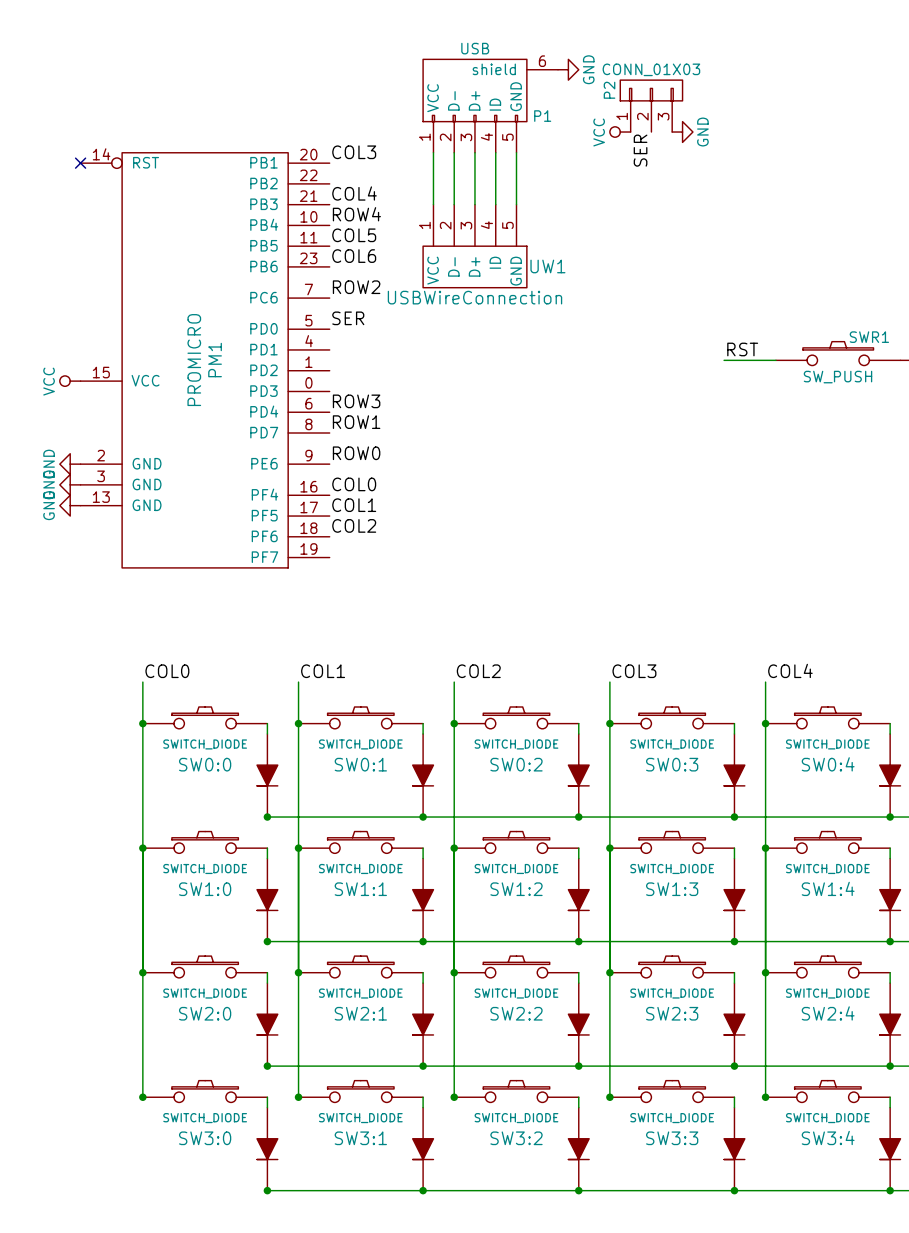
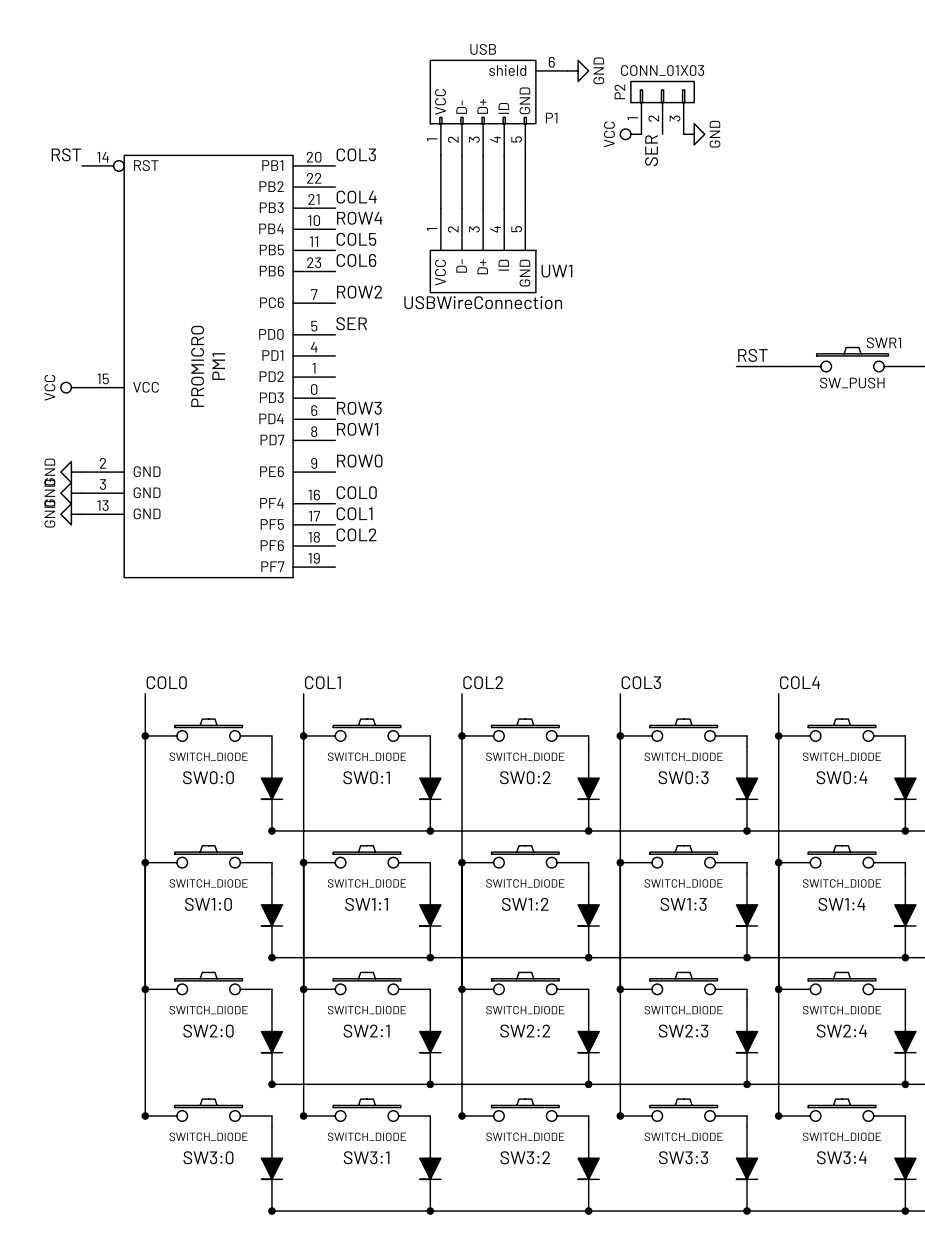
label: none -> RST (66, 154)
no-connect mark: (80, 163) -> none

